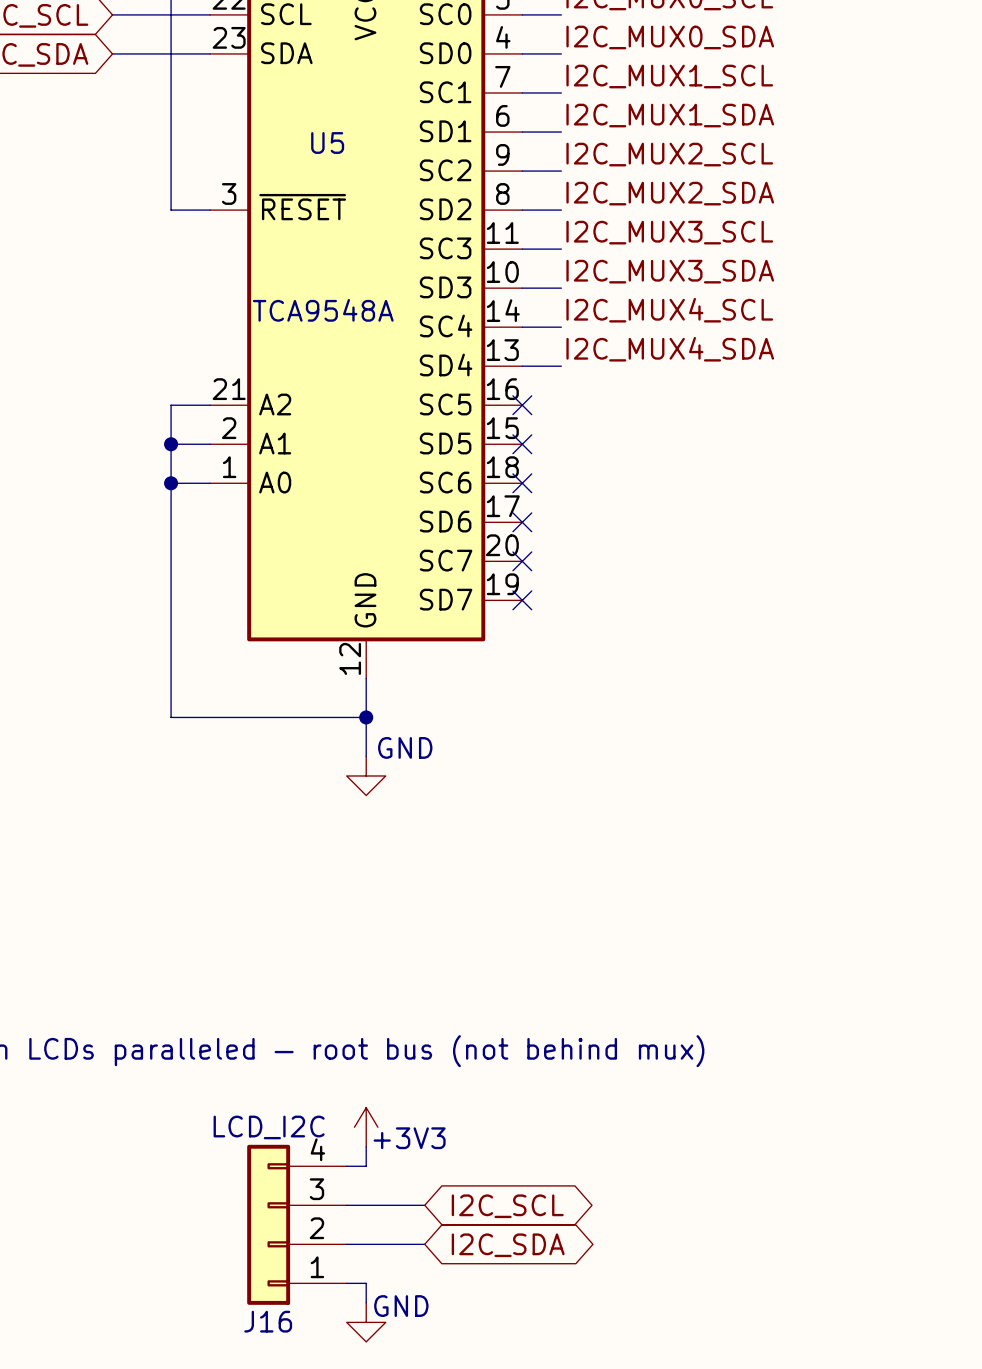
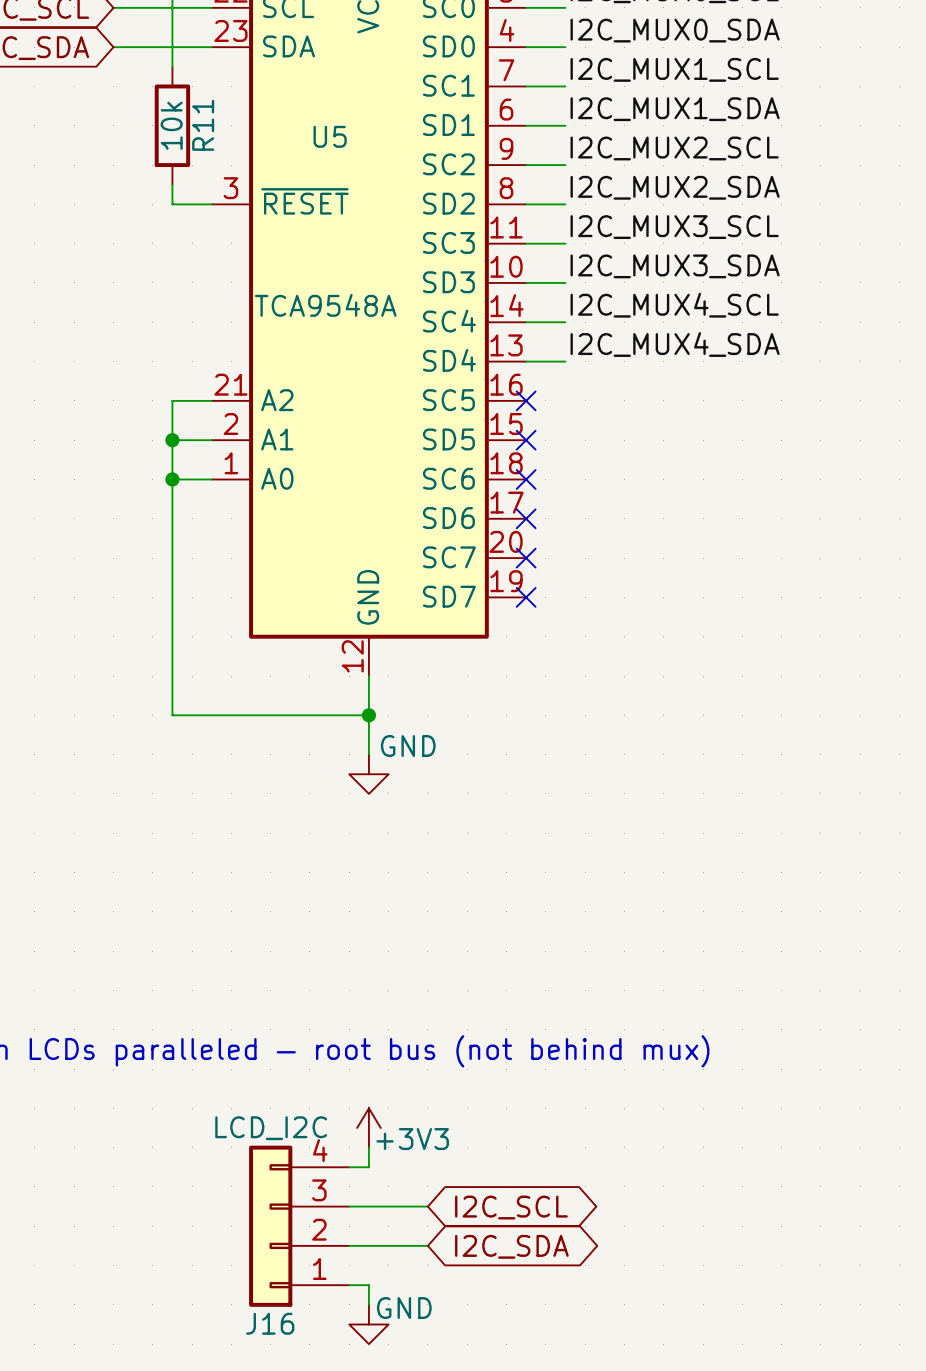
wire: (171, 73) (171, 190) -> none
R11: none -> 10k (172, 125)

